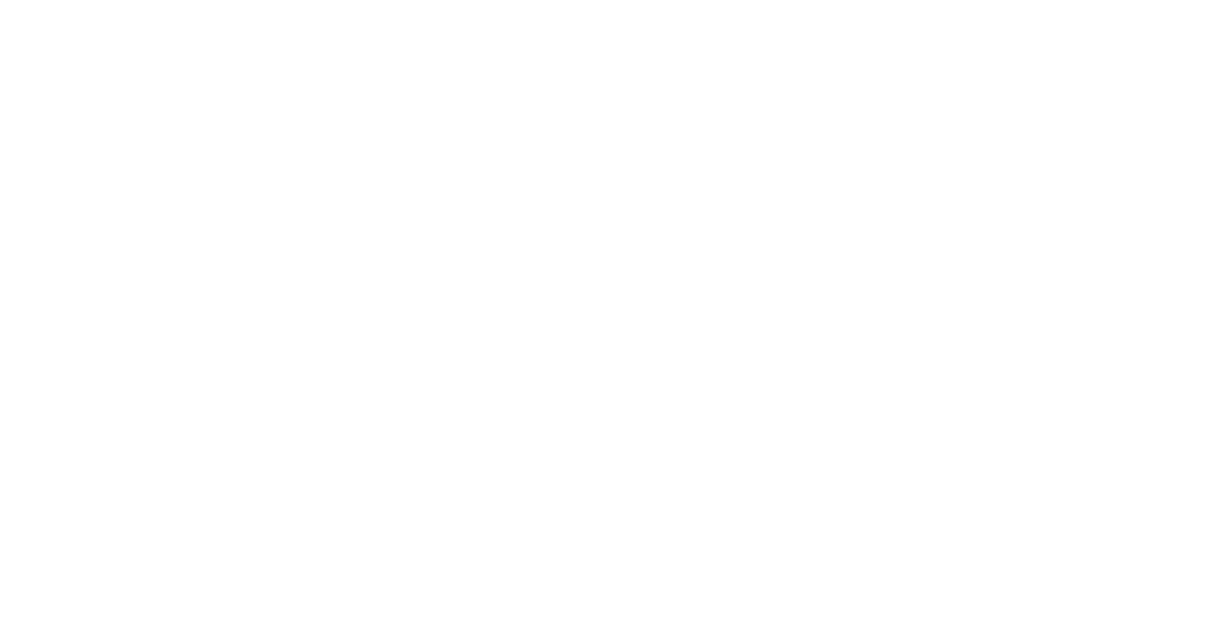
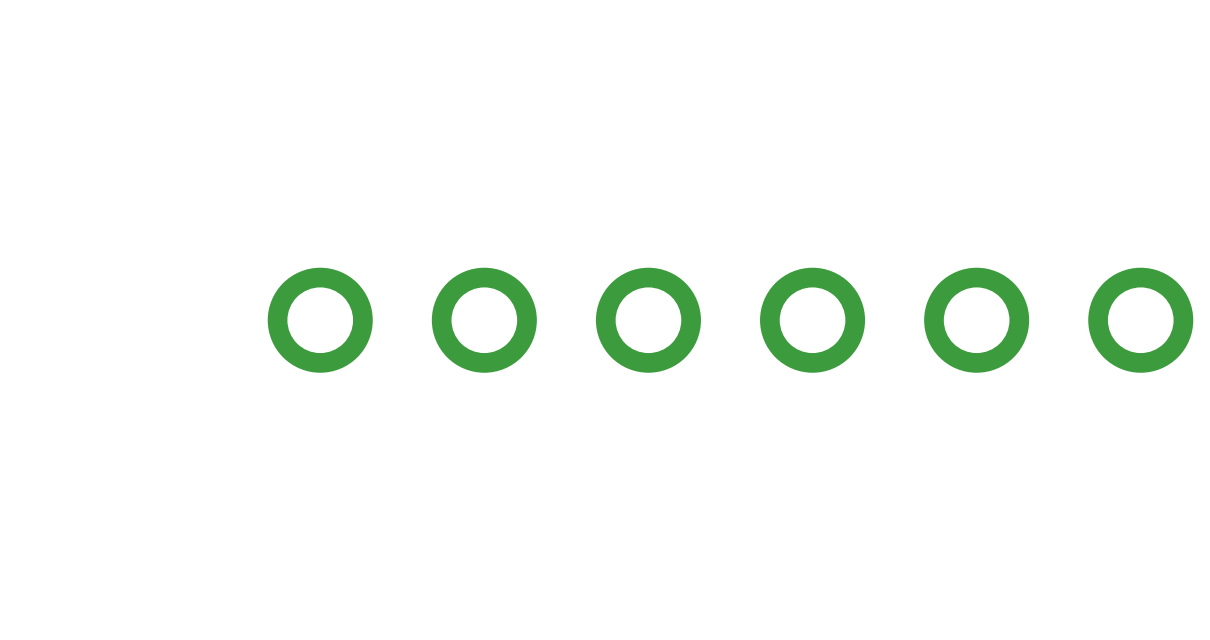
part: none -> (730, 320)

